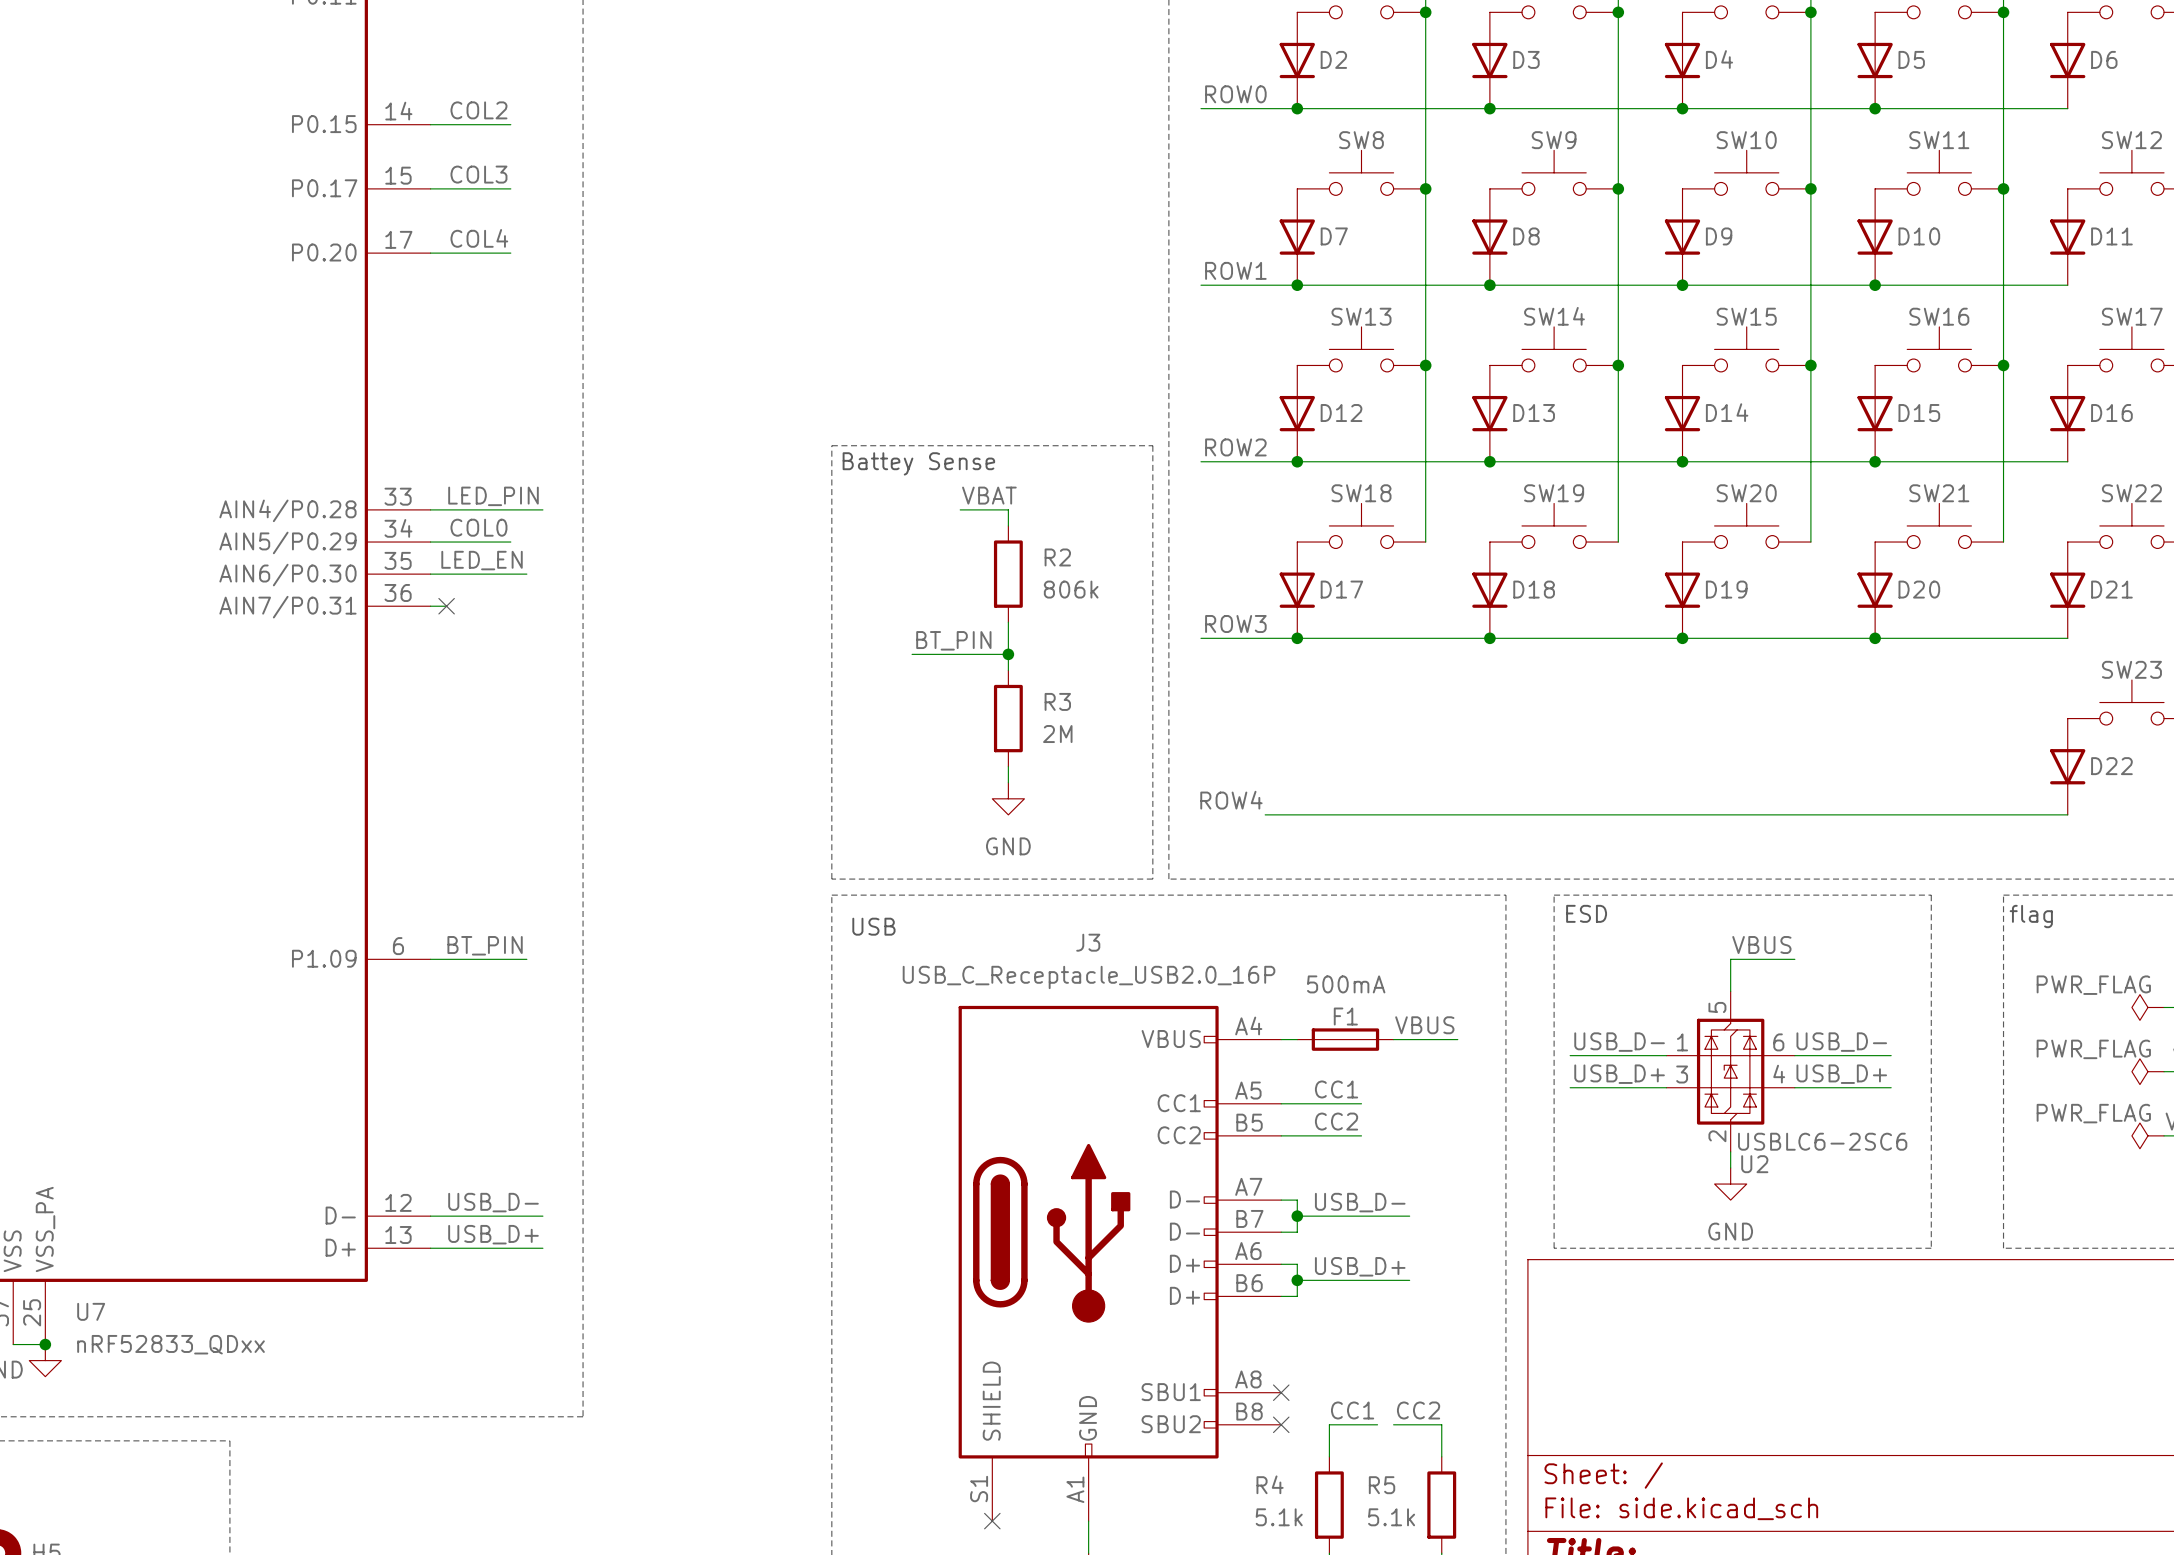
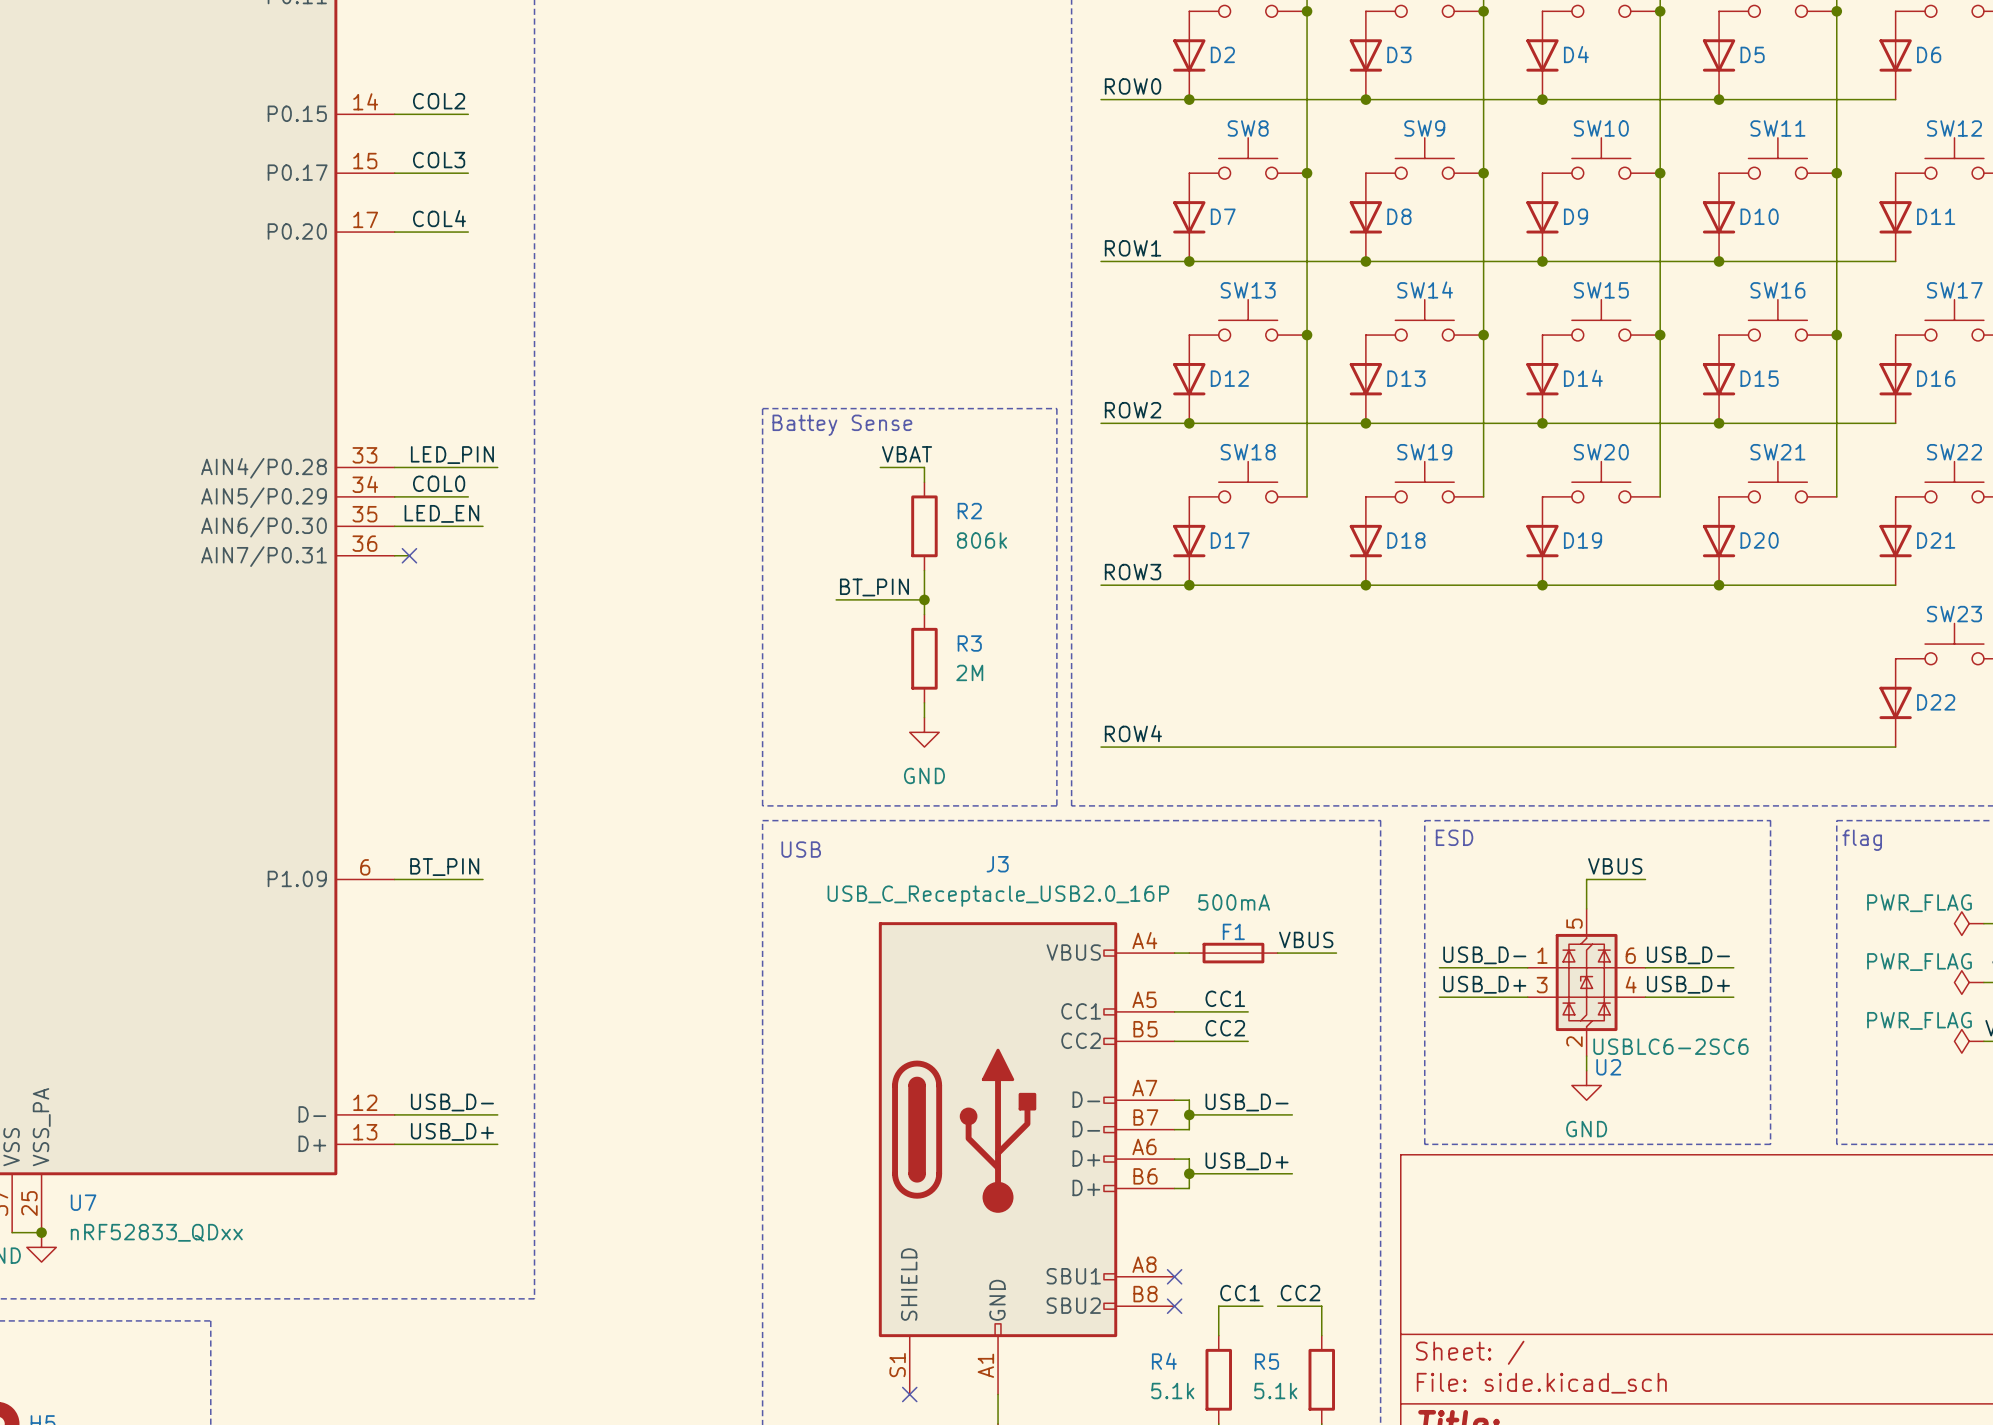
label position: ROW4 (1231, 800) -> ROW4 (1133, 733)
wire: none -> (1101, 747) (1159, 747)

